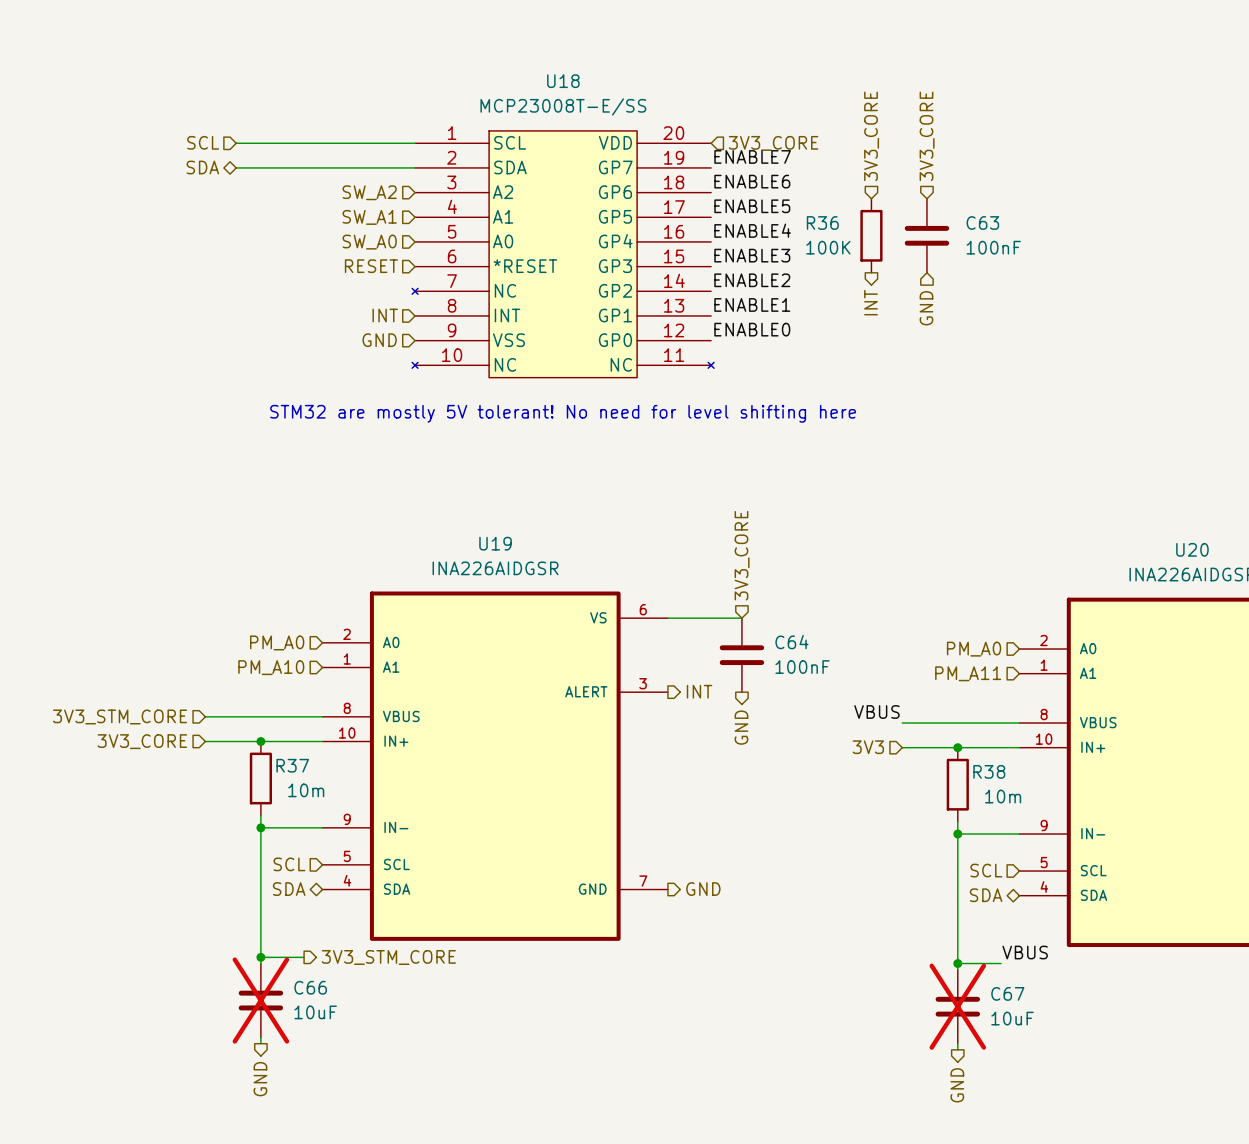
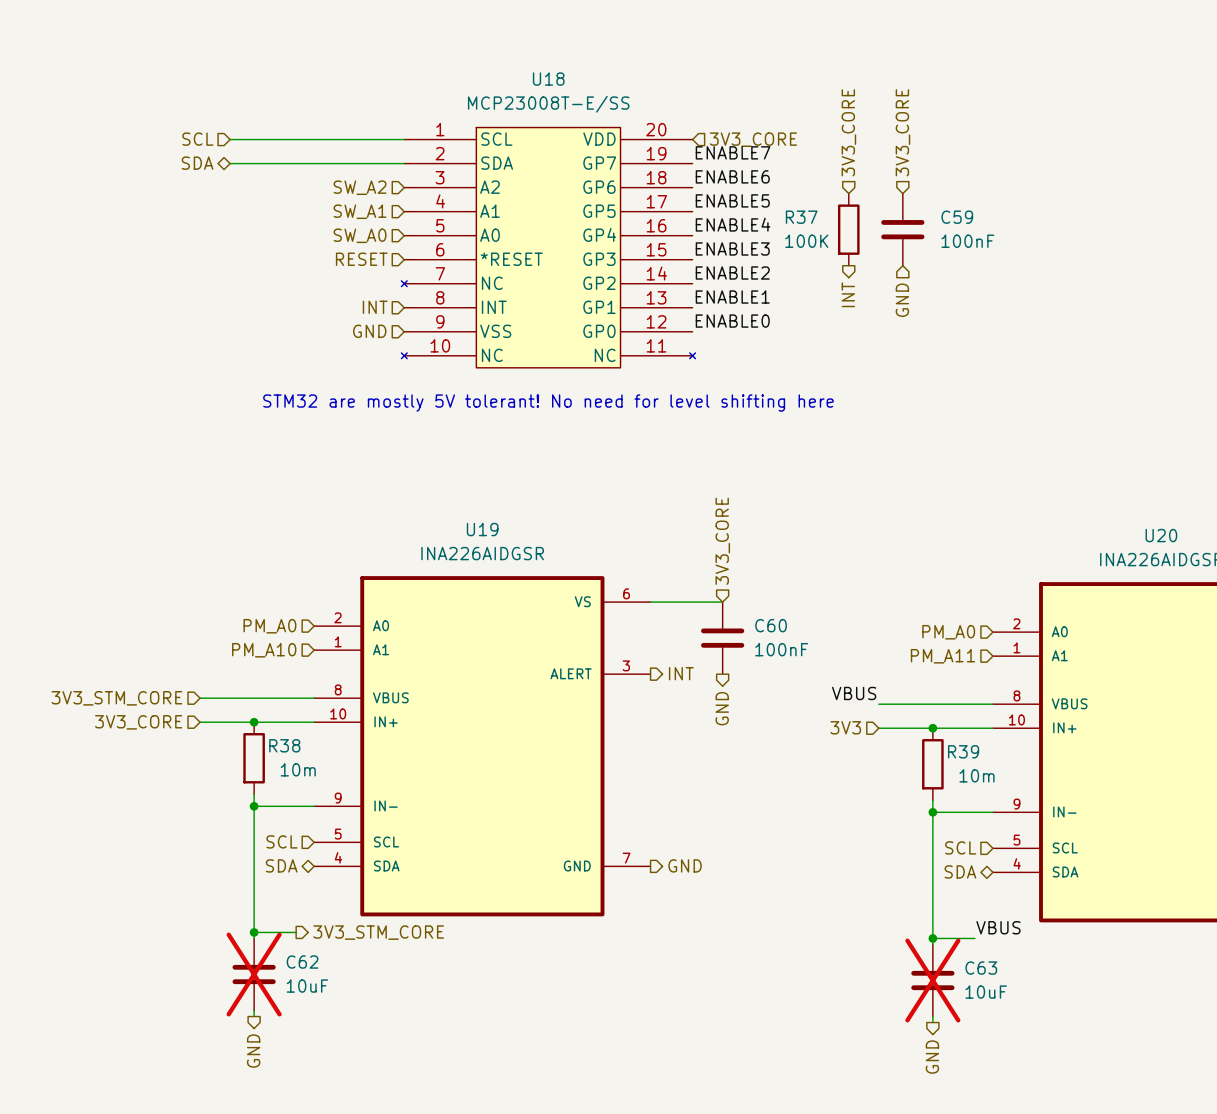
R36 name: R36 (822, 223) -> R37 (801, 217)
C63 name: C63 (982, 223) -> C59 (957, 217)
C64 name: C64 (791, 642) -> C60 (771, 625)
R37 name: R37 (292, 765) -> R38 (284, 745)
R38 name: R38 (989, 771) -> R39 (963, 751)
C66 name: C66 (310, 987) -> C62 (302, 962)
C67 name: C67 (1007, 993) -> C63 (981, 968)

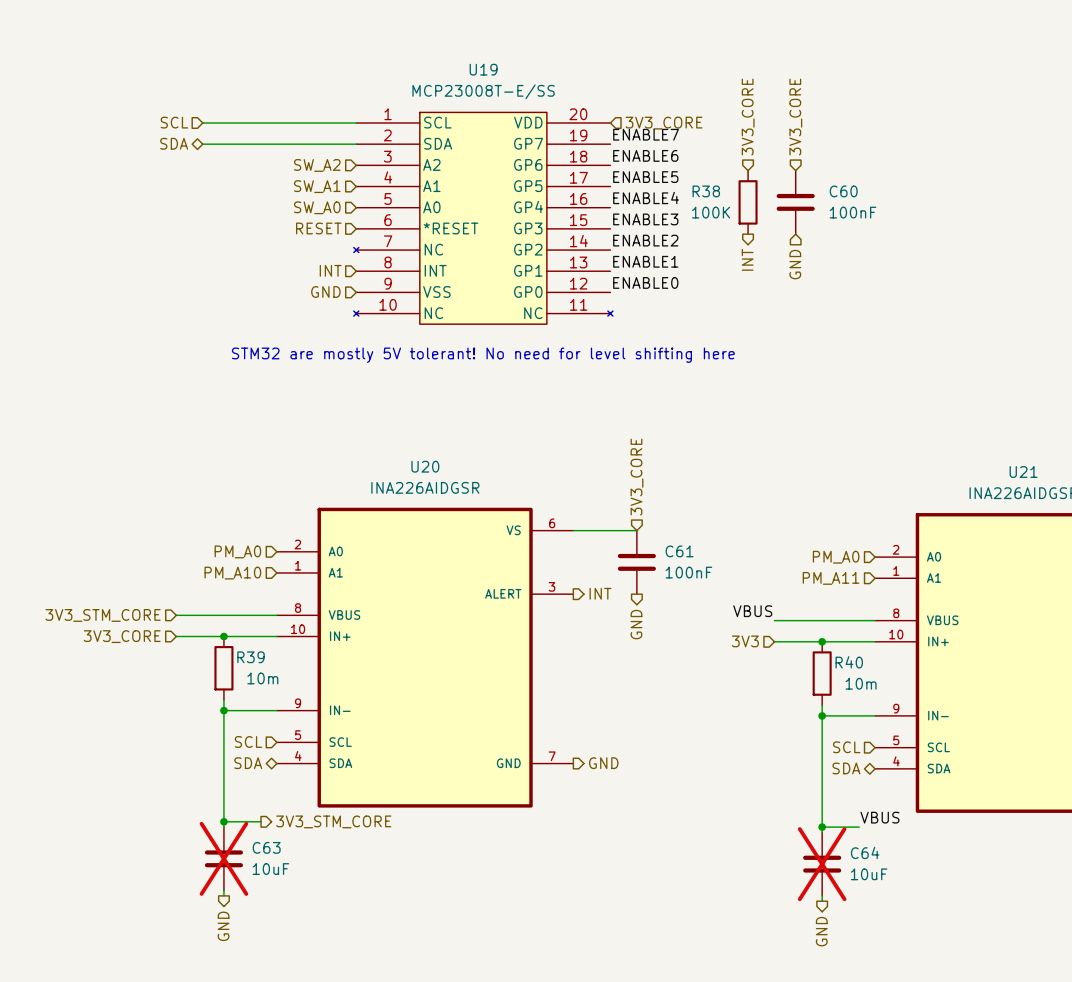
U18 name: U18 (548, 79) -> U19 (483, 69)
R37 name: R37 (801, 217) -> R38 (706, 191)
C59 name: C59 (957, 217) -> C60 (843, 191)
U19 name: U19 (482, 529) -> U20 (425, 466)
U20 name: U20 (1161, 535) -> U21 (1023, 472)
C60 name: C60 (771, 625) -> C61 (679, 551)
R38 name: R38 (284, 745) -> R39 (251, 657)
R39 name: R39 (963, 751) -> R40 (849, 662)
C62 name: C62 (302, 962) -> C63 (266, 847)
C63 name: C63 (981, 968) -> C64 (865, 852)

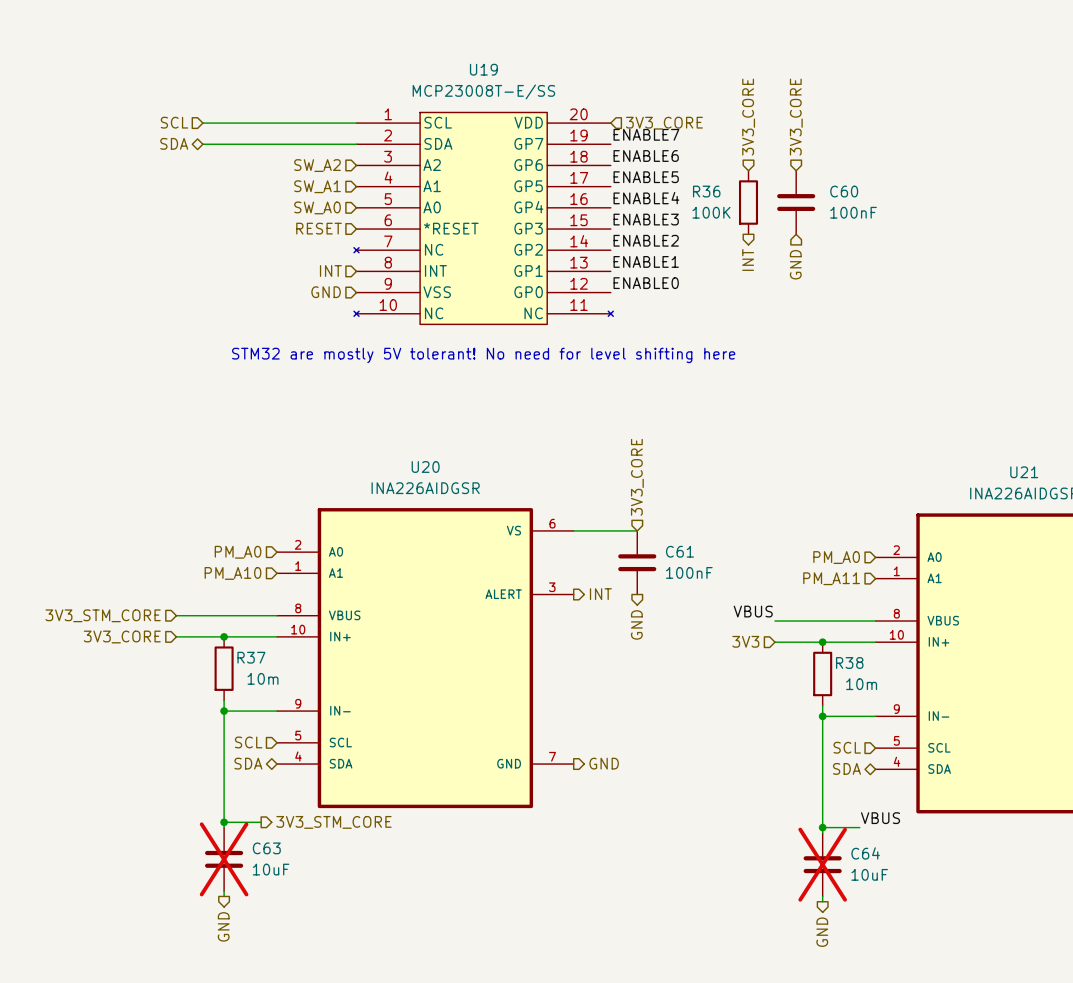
R38 name: R38 (706, 191) -> R36 (706, 191)
R39 name: R39 (251, 657) -> R37 (251, 657)
R40 name: R40 (849, 662) -> R38 (849, 662)

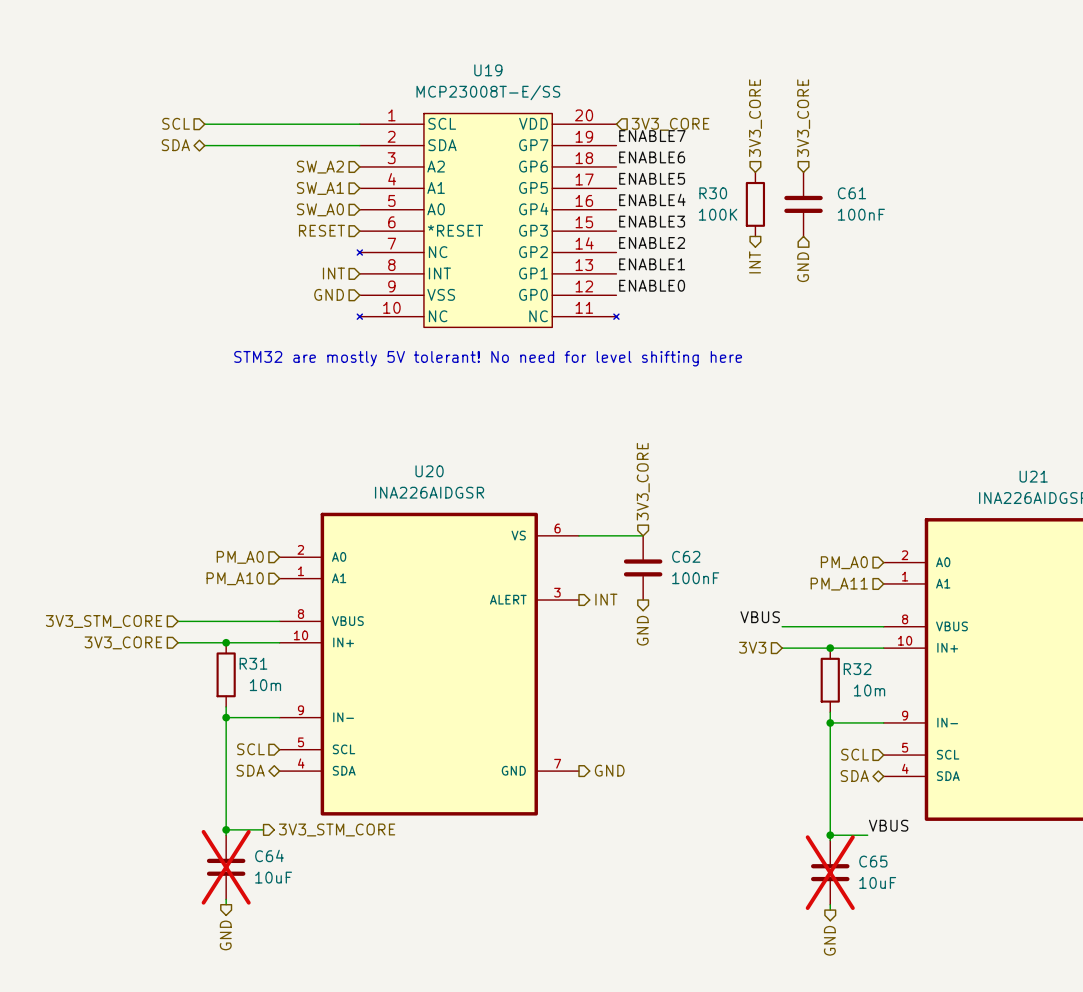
R36 name: R36 (706, 191) -> R30 (713, 193)
C60 name: C60 (844, 191) -> C61 (851, 193)
C61 name: C61 (679, 551) -> C62 (686, 556)
R37 name: R37 (251, 657) -> R31 (253, 663)
R38 name: R38 (849, 662) -> R32 (857, 669)
C63 name: C63 (266, 848) -> C64 (269, 855)
C64 name: C64 (865, 853) -> C65 (873, 861)

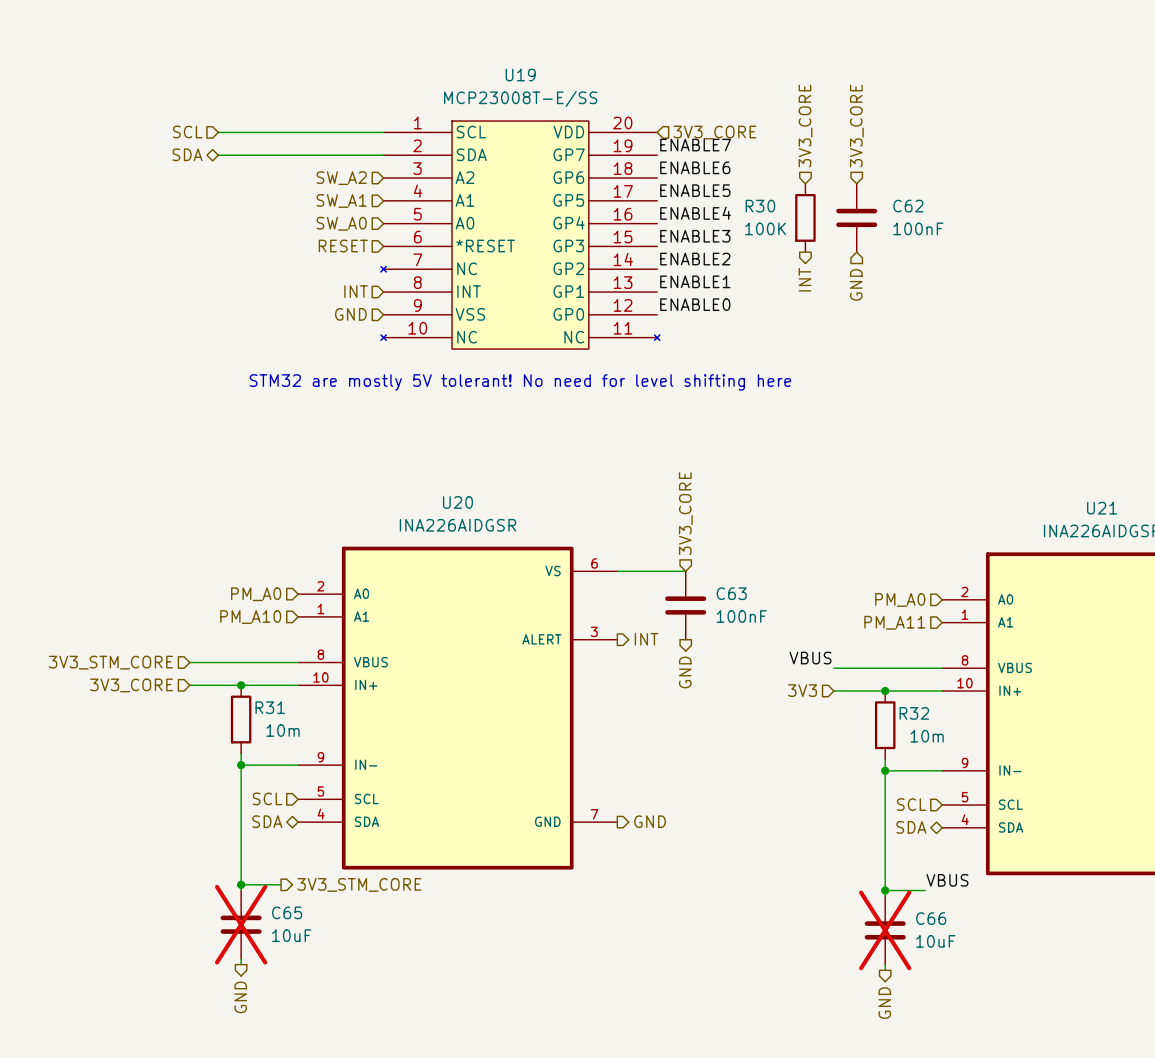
C61 name: C61 (851, 193) -> C62 (908, 206)
C62 name: C62 (686, 556) -> C63 (731, 593)
C64 name: C64 (269, 855) -> C65 (287, 912)
C65 name: C65 (873, 861) -> C66 (931, 918)

